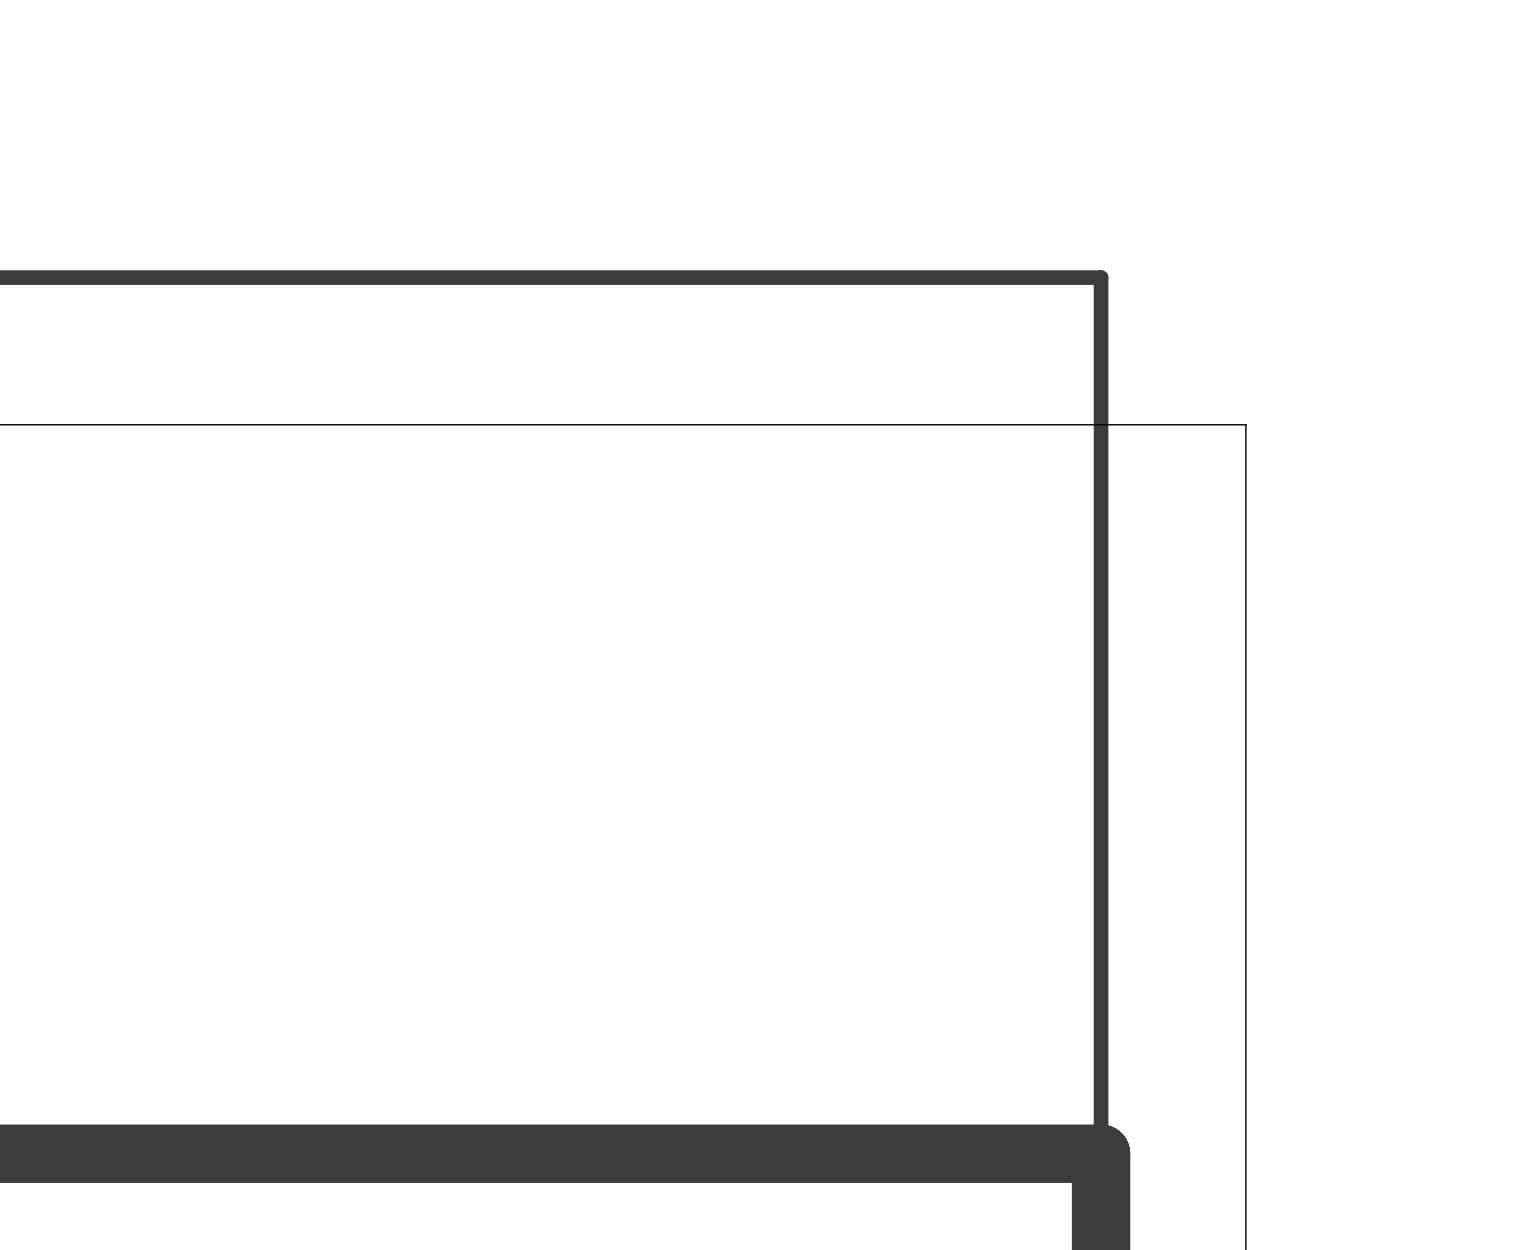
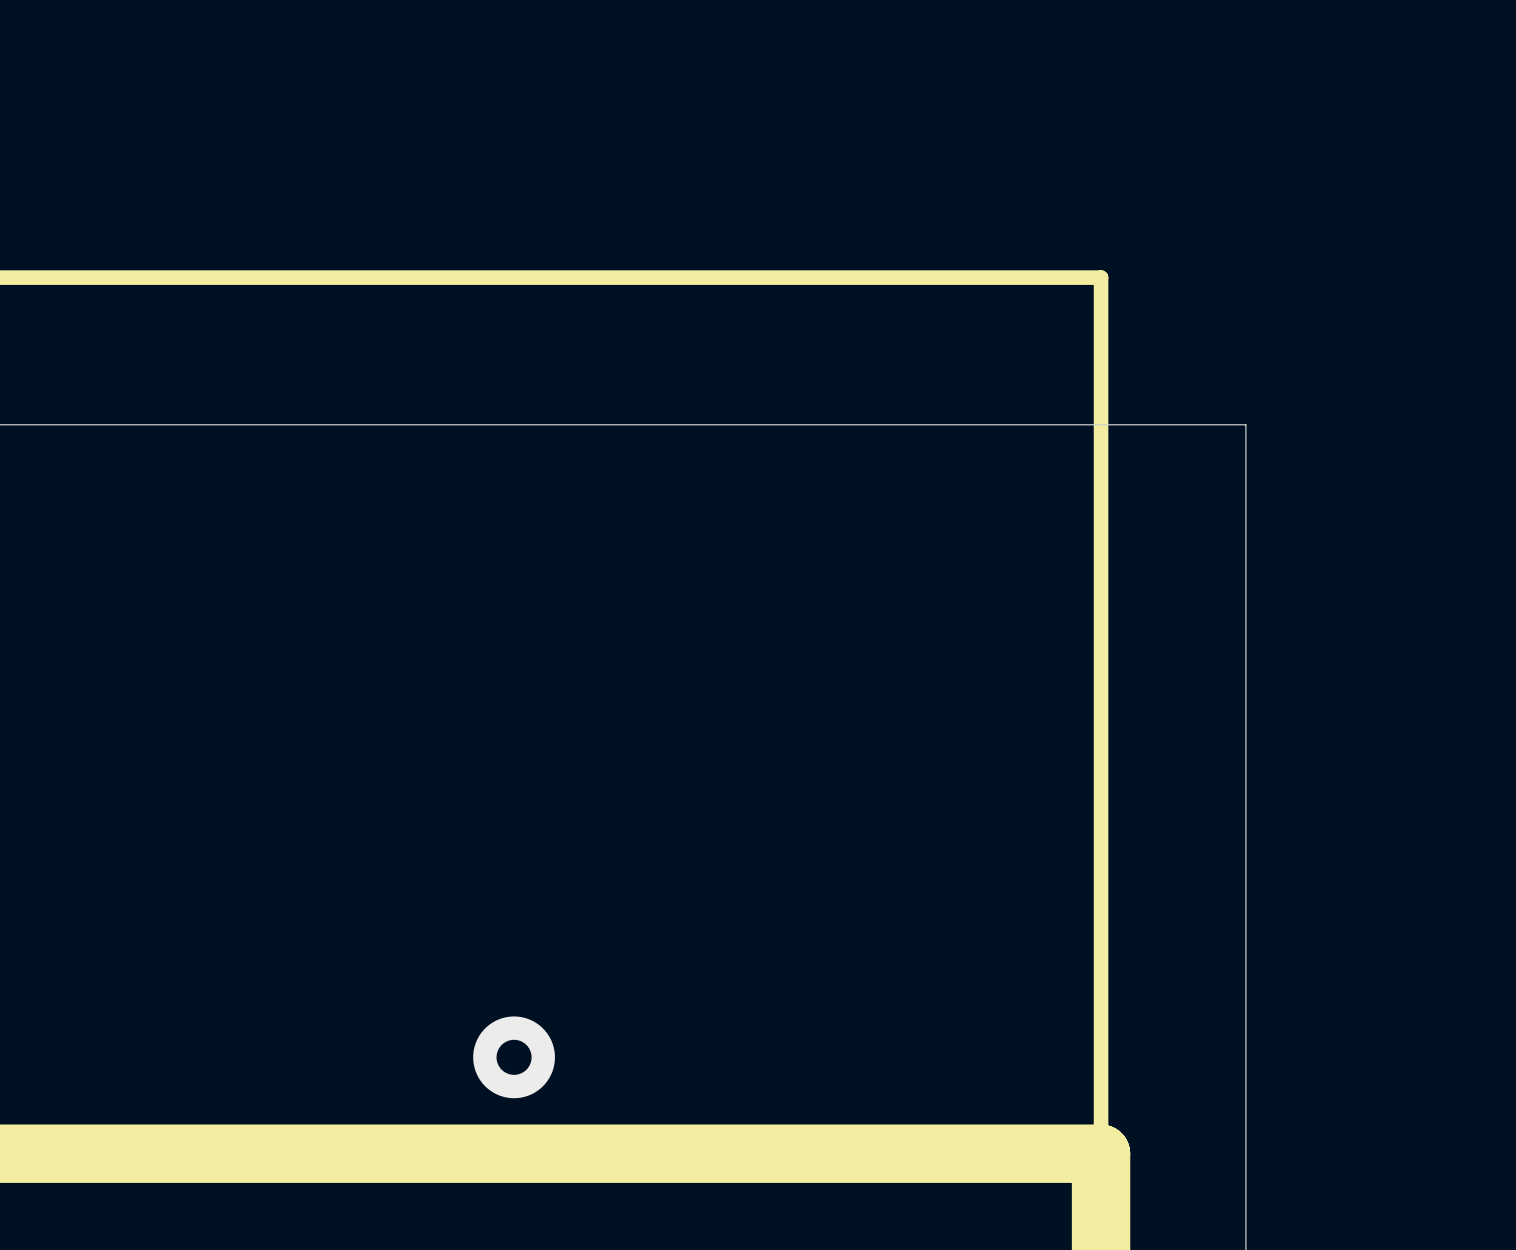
via: none -> (514, 1057)

